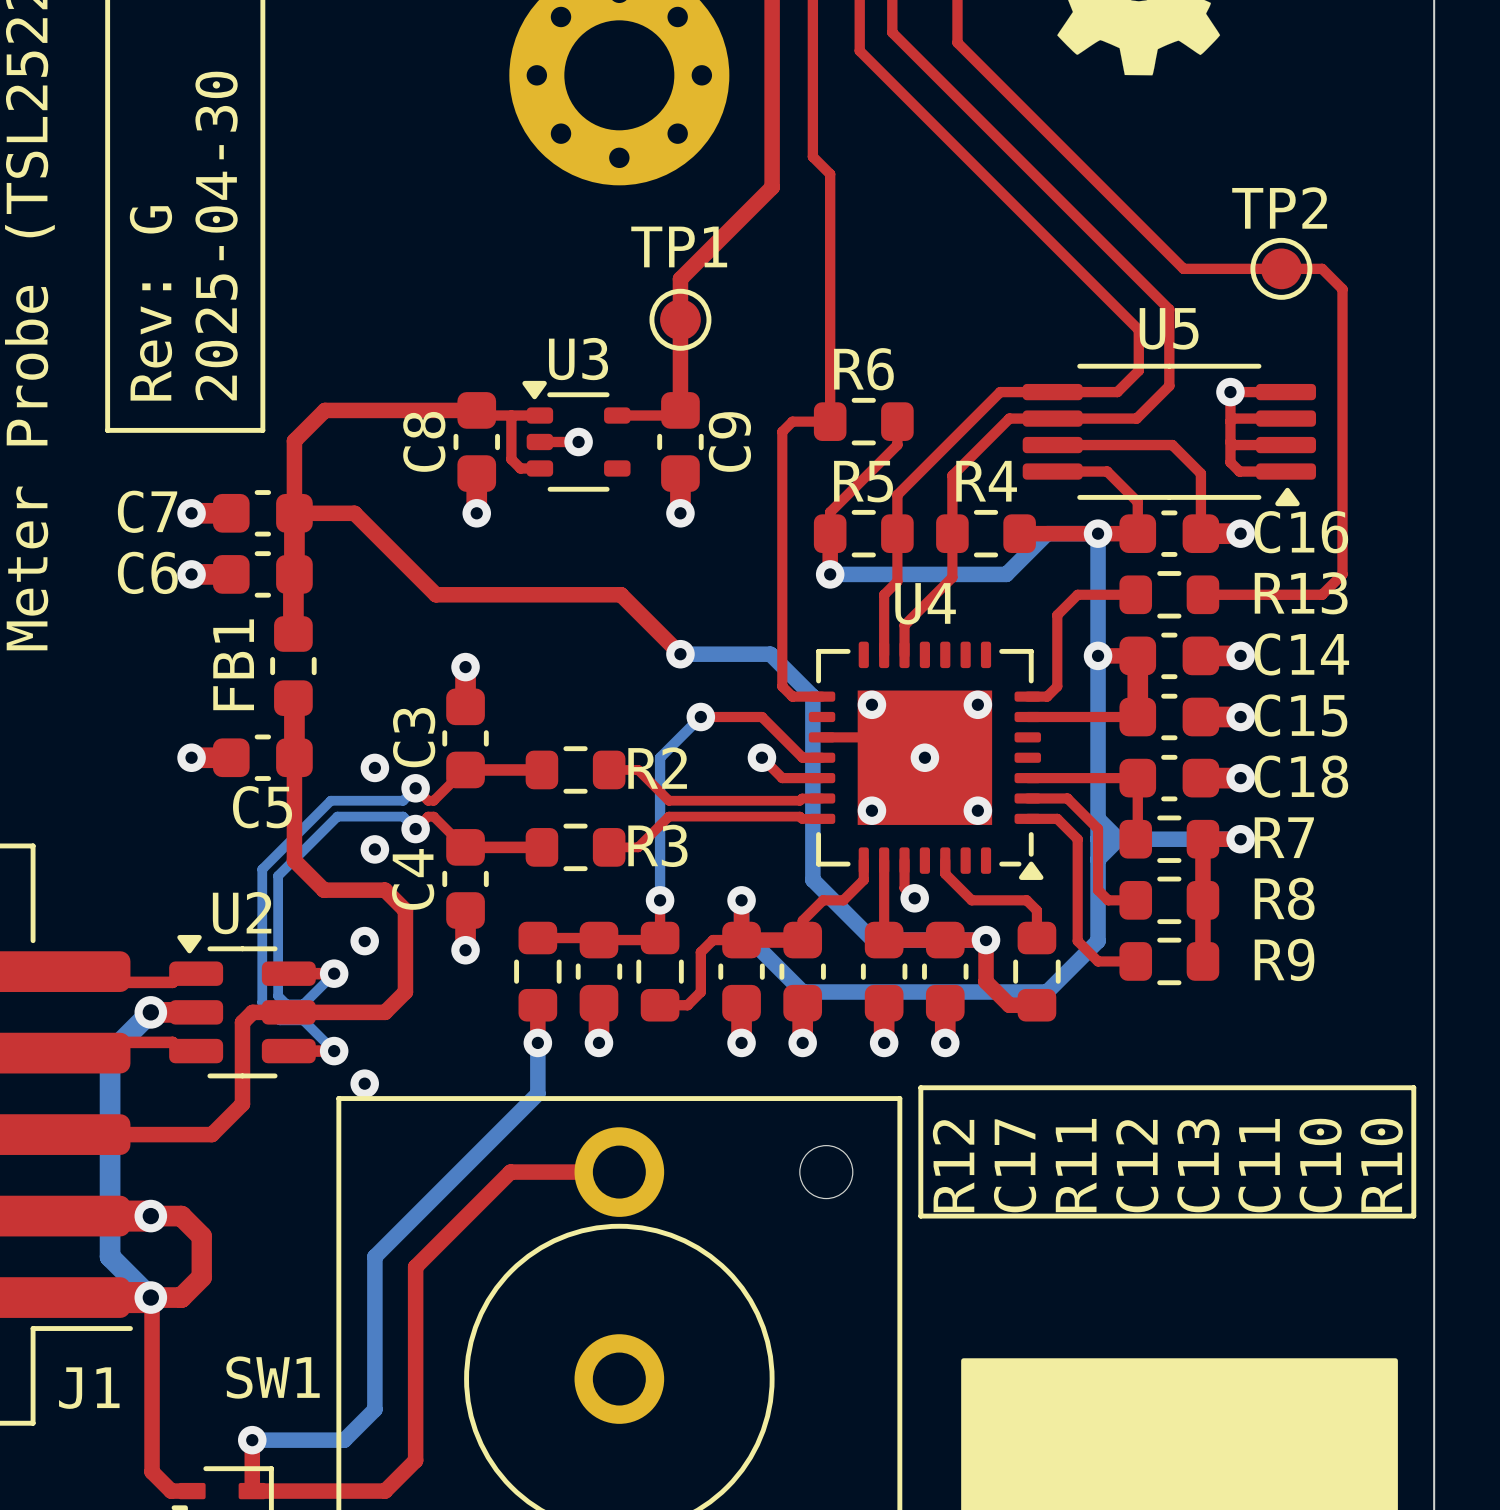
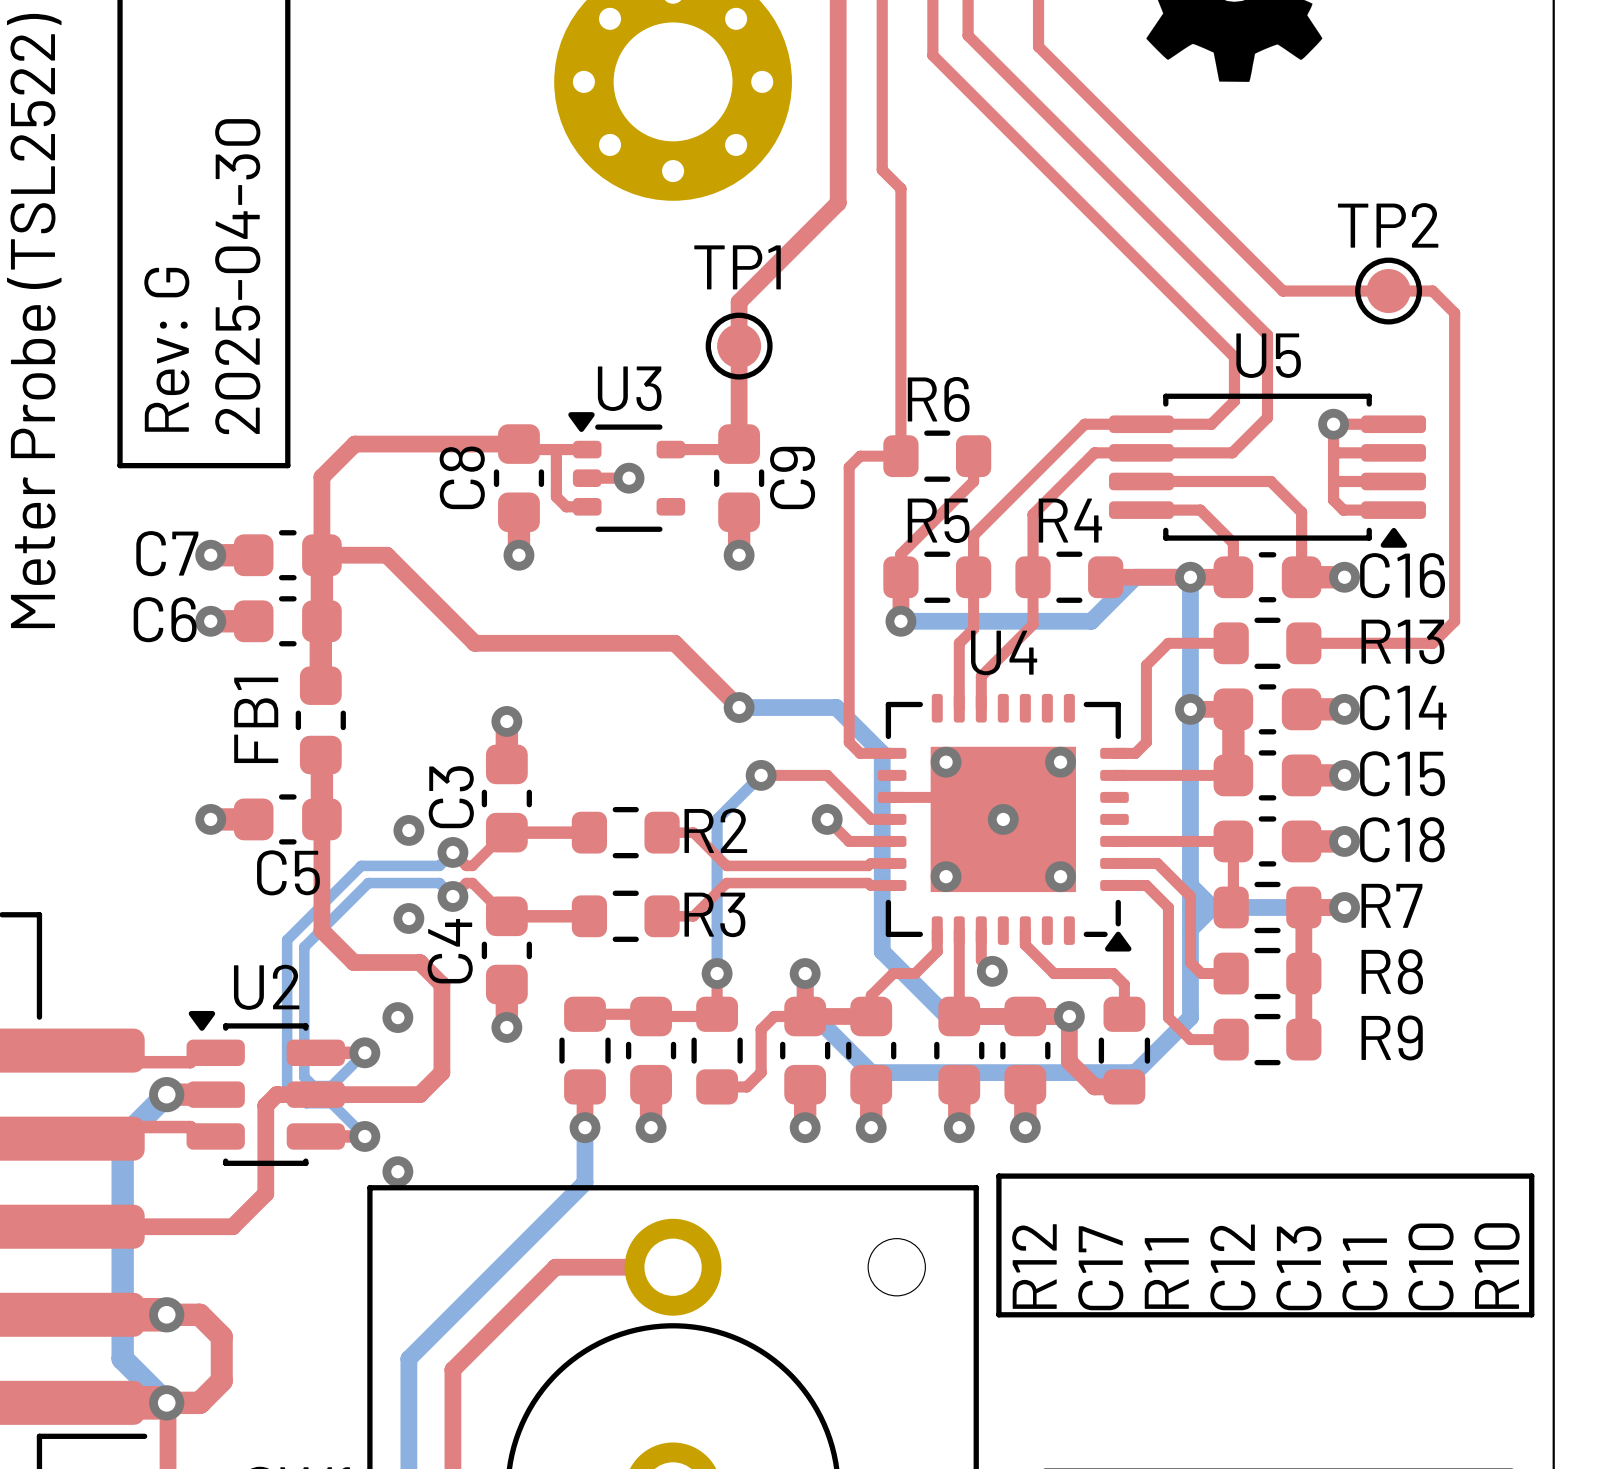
U5 footprint: [1022, 363, 1317, 507] -> [1108, 393, 1427, 548]
U2 footprint: [169, 934, 316, 1079] -> [186, 1010, 346, 1166]

